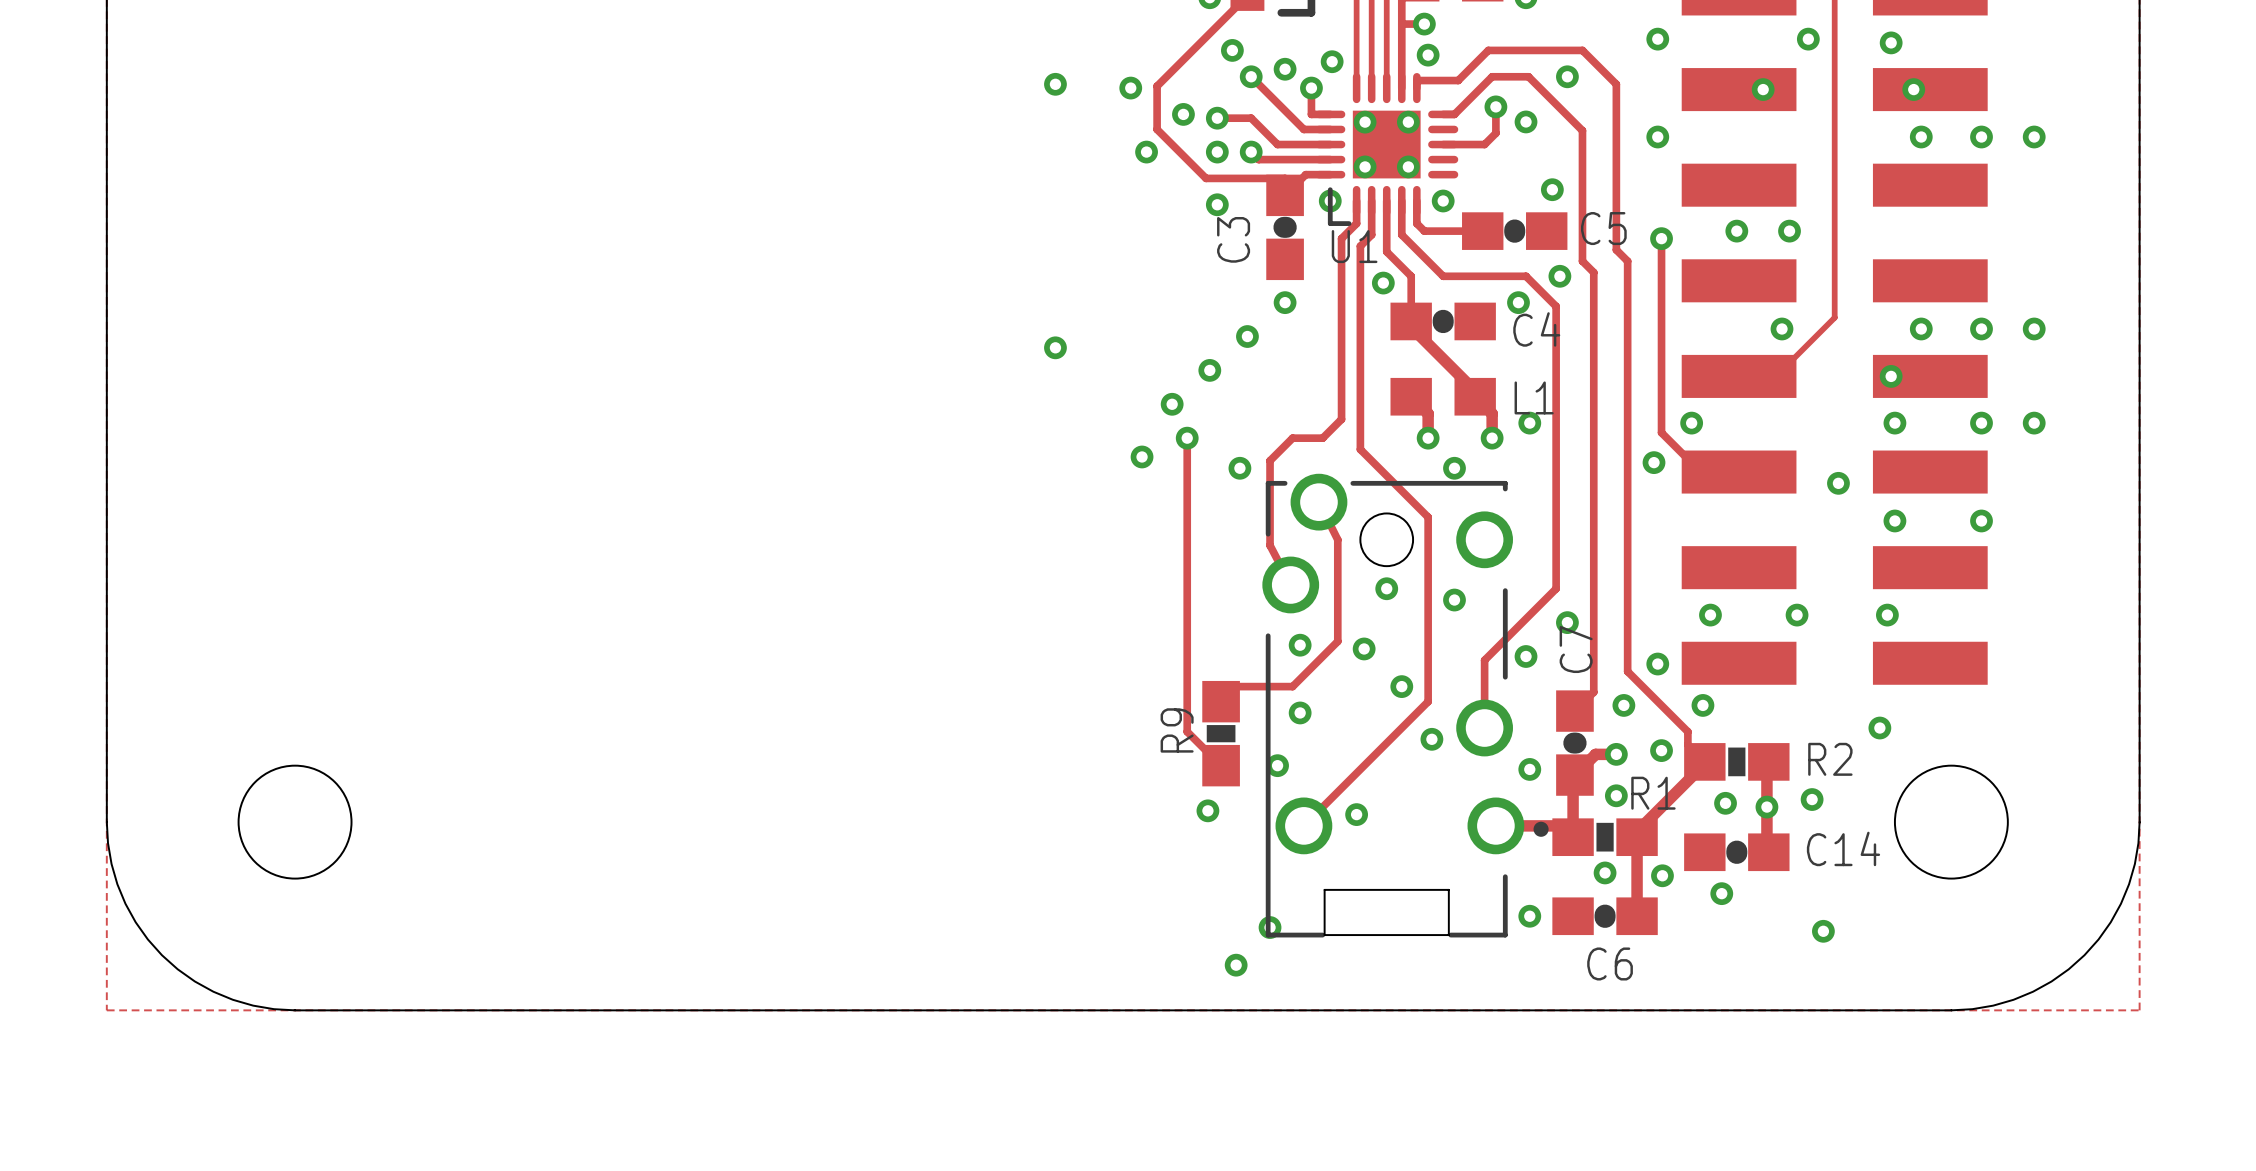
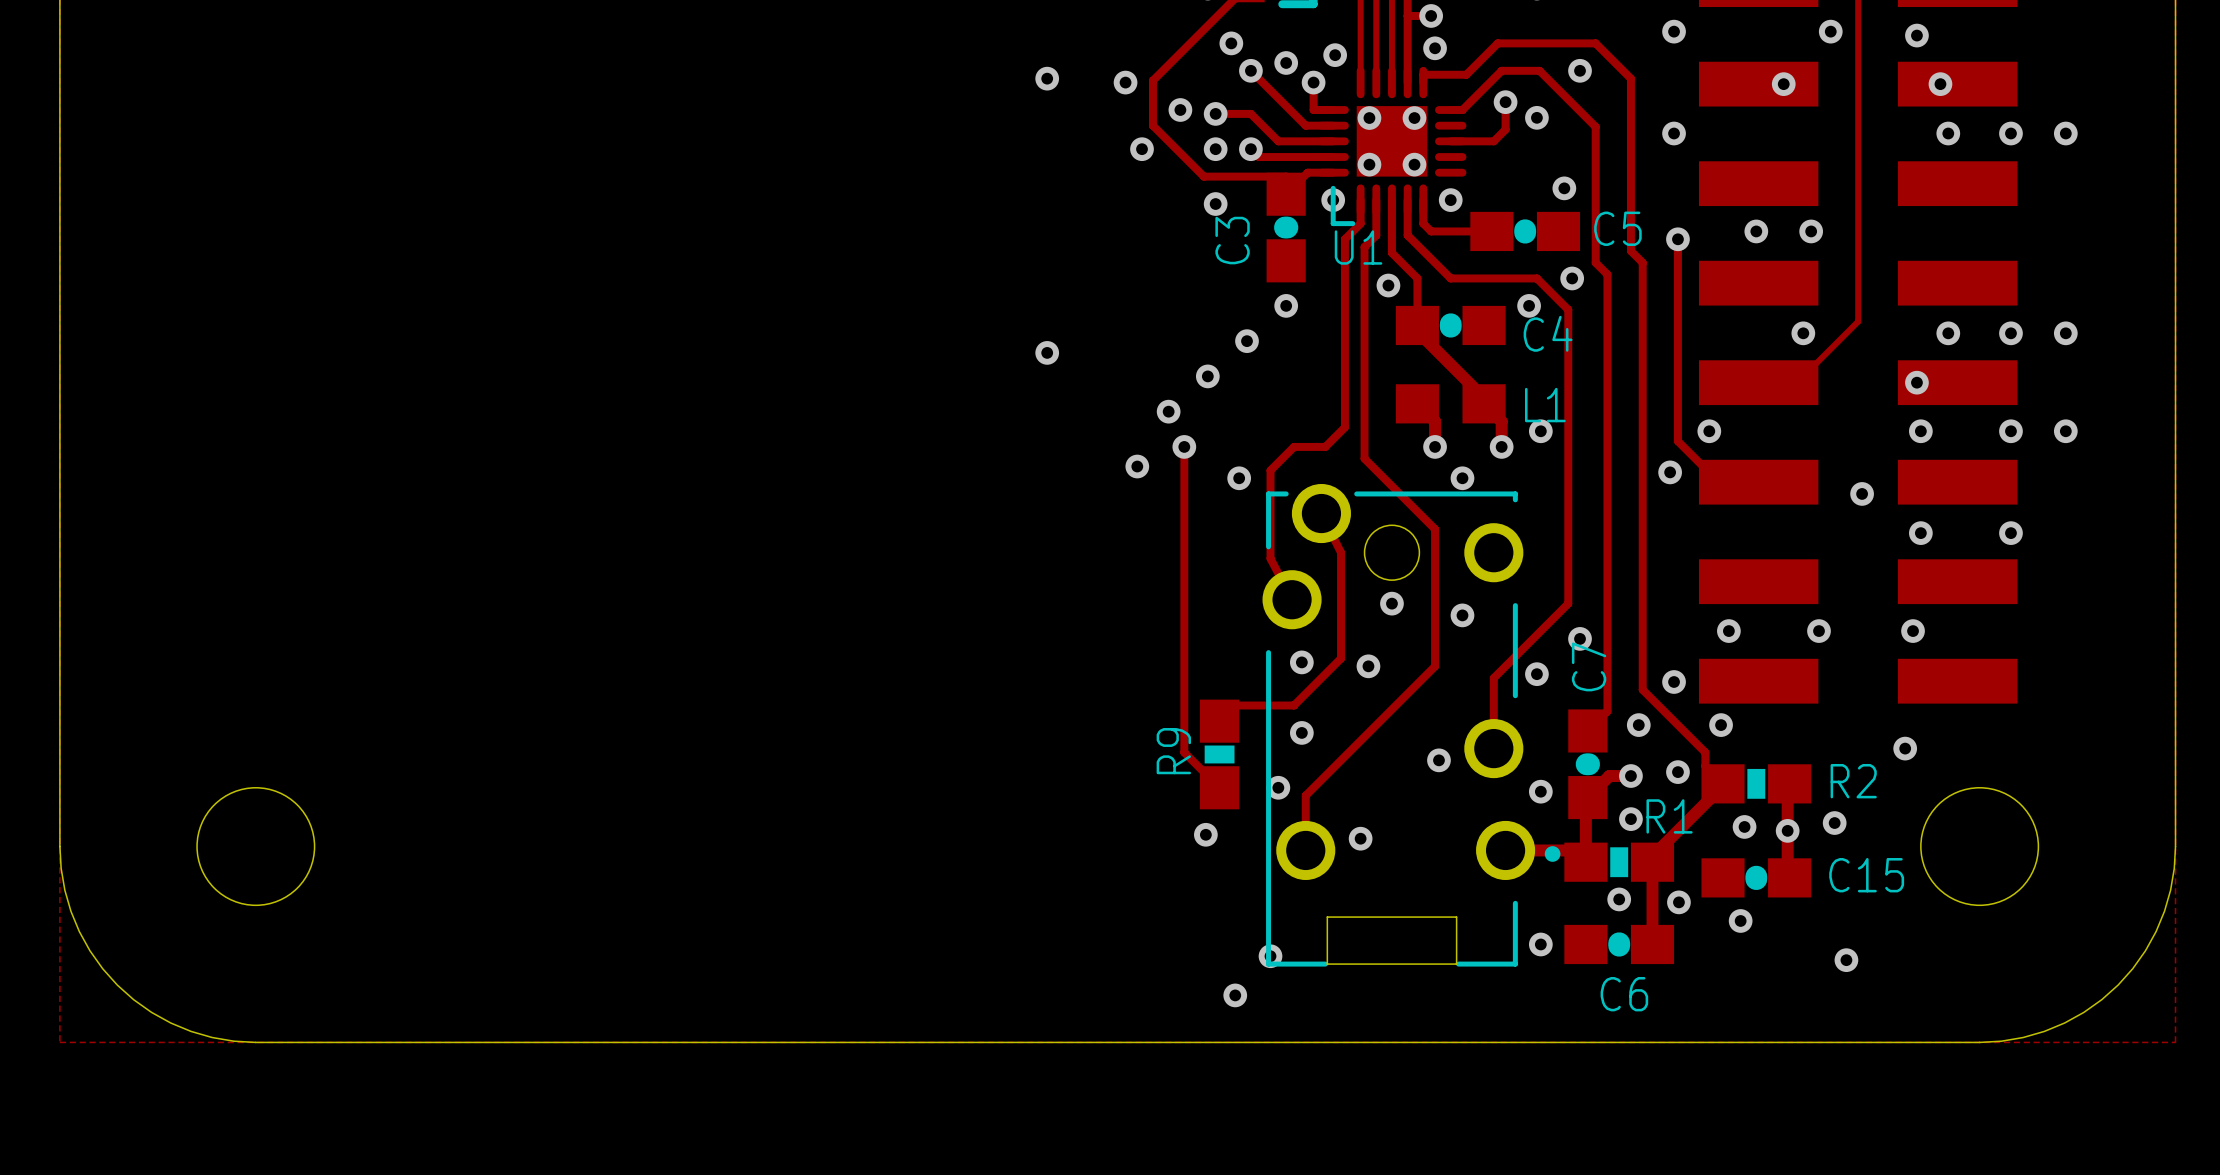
track: (1428, 648) (1428, 701) (1303, 825) -> (1435, 666) (1305, 795) (1305, 850)
via: (1401, 686) -> none
C14 name: C14 (1843, 848) -> C15 (1866, 875)

